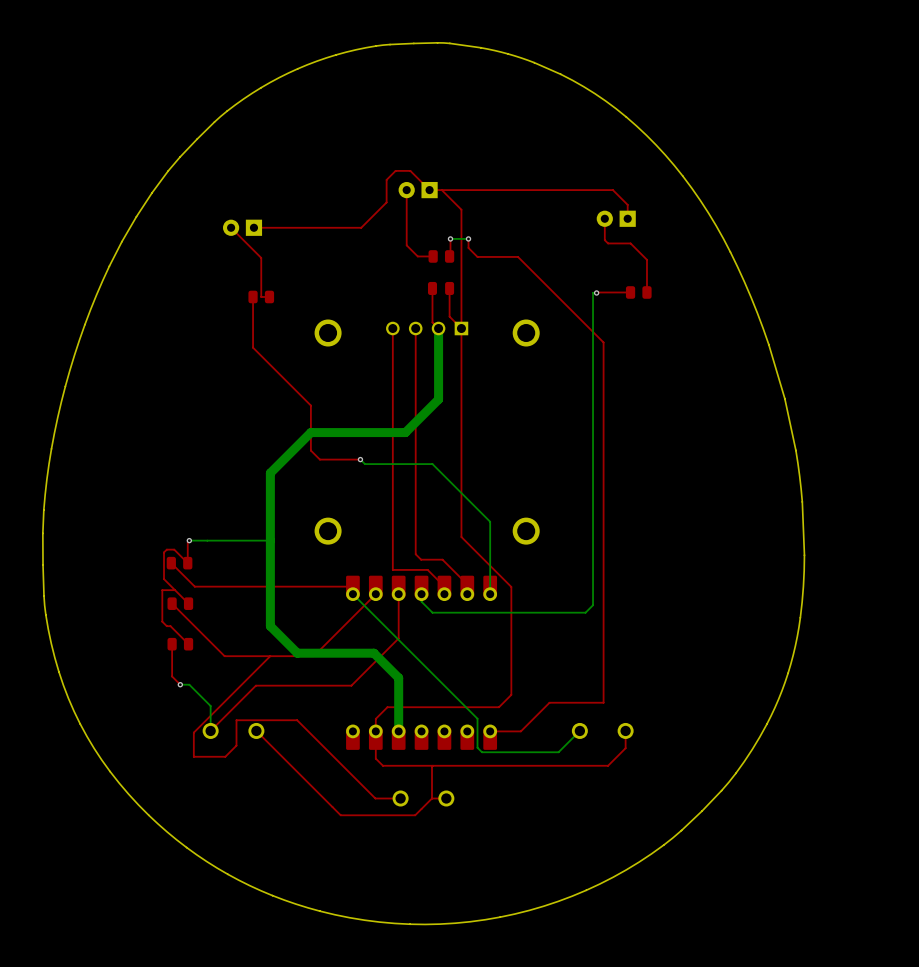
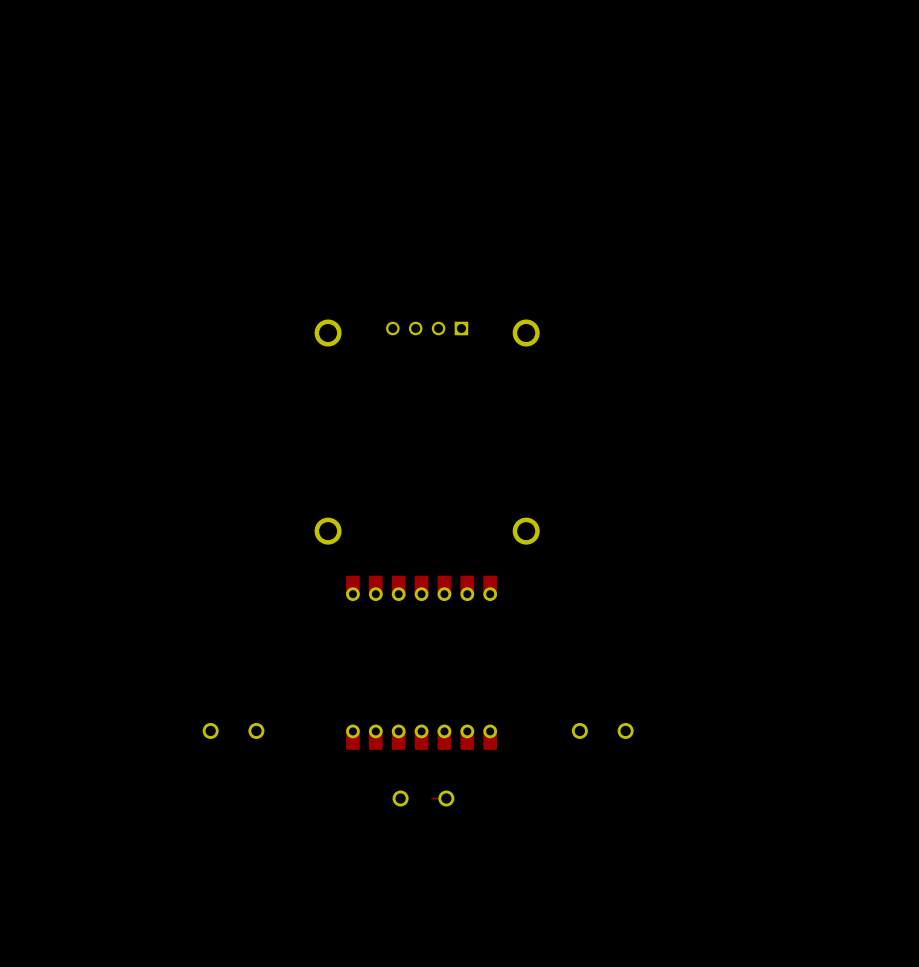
board edge: (437, 42) (390, 44) (366, 47) (326, 57) (288, 73) (261, 87) (227, 111) (197, 139) (168, 170) (152, 192) (121, 241) (96, 295) (79, 339) (65, 386) (54, 433) (46, 479) (42, 533) (45, 614) (51, 643) (63, 685) (74, 711) (94, 748) (110, 771) (138, 804) (167, 832) (196, 854) (227, 874) (261, 890) (296, 904) (334, 914) (364, 920) (410, 924) (440, 924) (485, 919) (514, 914) (558, 901) (599, 884) (626, 869) (651, 853) (681, 830) (721, 790) (735, 773) (752, 749) (771, 716) (785, 682) (795, 645) (800, 617) (804, 570) (801, 489) (795, 450) (784, 398) (768, 344) (751, 297) (723, 238) (700, 200) (674, 165) (646, 135) (616, 108) (583, 86) (560, 74) (514, 55) (480, 47) (437, 42) -> none
top track: (406, 190) (406, 245) (417, 256) (433, 256) -> none
part: (418, 190) -> none
top track: (441, 190) (461, 209) (461, 537) (511, 586) (511, 694) (499, 707) (387, 707) (375, 718) (375, 758) (382, 765) (608, 765) (625, 748) (625, 730) -> none
top track: (604, 218) (604, 240) (608, 243) (630, 243) (646, 259) (646, 292) -> none
part: (616, 218) -> none
top track: (627, 218) (627, 204) (612, 190) (429, 190) (410, 170) (395, 170) (386, 179) (386, 202) (361, 227) (253, 227) -> none
top track: (231, 227) (261, 257) (261, 296) (269, 296) -> none
part: (242, 227) -> none
top track: (450, 238) (449, 256) -> none
via: (450, 238) -> none
bottom track: (468, 238) (450, 238) -> none
top track: (468, 238) (468, 247) (477, 256) (518, 256) (603, 342) (603, 702) (549, 702) (520, 731) (490, 731) -> none
via: (468, 238) -> none
part: (441, 256) -> none
top track: (432, 288) (432, 322) (438, 328) -> none
part: (441, 288) -> none
top track: (449, 288) (449, 316) (461, 328) -> none
bottom track: (596, 292) (593, 292) (593, 605) (585, 612) (432, 612) (421, 601) (421, 594) -> none
via: (596, 292) -> none
top track: (630, 292) (596, 292) -> none
part: (638, 292) -> none
top track: (253, 296) (253, 347) (310, 405) (310, 450) (319, 459) (360, 459) -> none
part: (261, 296) -> none
top track: (392, 328) (392, 569) (427, 569) (444, 586) (444, 594) -> none
top track: (415, 328) (415, 554) (421, 559) (442, 559) (467, 584) (467, 594) -> none
bottom track: (438, 328) (438, 399) (405, 432) (310, 432) (270, 473) (270, 626) (297, 653) (373, 653) (398, 677) (398, 731) -> none
bottom track: (360, 459) (364, 464) (432, 464) (490, 521) (490, 594) -> none
via: (360, 459) -> none
top track: (189, 540) (187, 563) (174, 549) (166, 549) (164, 552) (164, 579) (188, 603) -> none
via: (189, 540) -> none
bottom track: (270, 540) (189, 540) -> none
top track: (171, 563) (194, 586) (352, 586) -> none
part: (179, 563) -> none
top track: (175, 590) (162, 590) (162, 621) (166, 626) (170, 626) (188, 644) -> none
bottom track: (352, 594) (477, 718) (477, 747) (482, 752) (558, 752) (579, 730) -> none
top track: (375, 594) (313, 656) (224, 656) (172, 603) -> none
top track: (398, 594) (398, 638) (351, 685) (255, 685) (210, 730) -> none
part: (180, 603) -> none
top track: (172, 644) (172, 676) (180, 684) -> none
part: (180, 644) -> none
top track: (270, 656) (193, 732) (193, 756) (225, 756) (236, 745) (236, 720) (297, 720) (375, 798) (400, 798) -> none
bottom track: (180, 684) (189, 684) (210, 706) (210, 730) -> none
via: (180, 684) -> none
top track: (256, 730) (340, 815) (415, 815) (432, 798) (432, 765) -> none

